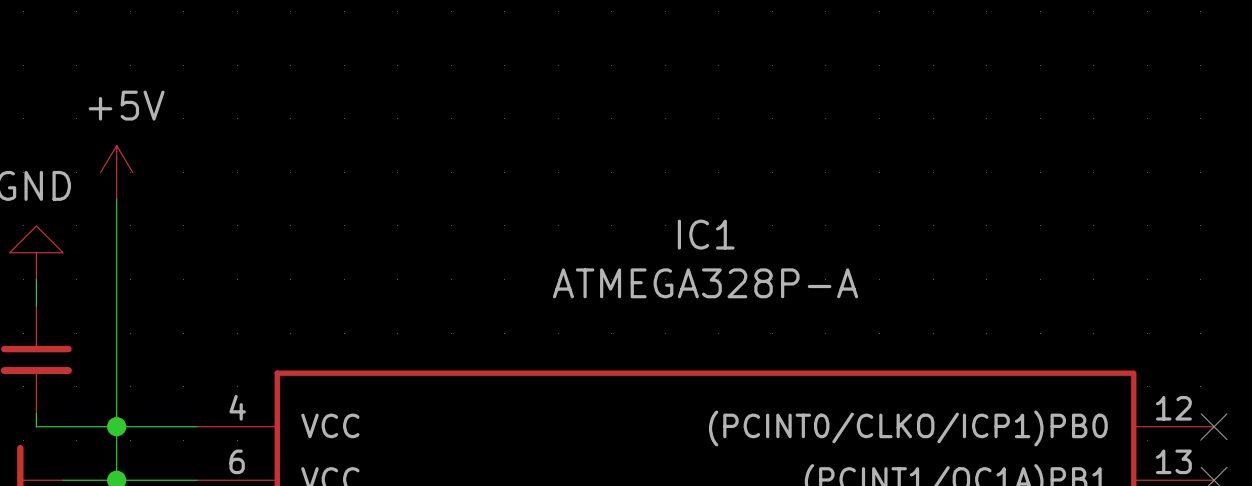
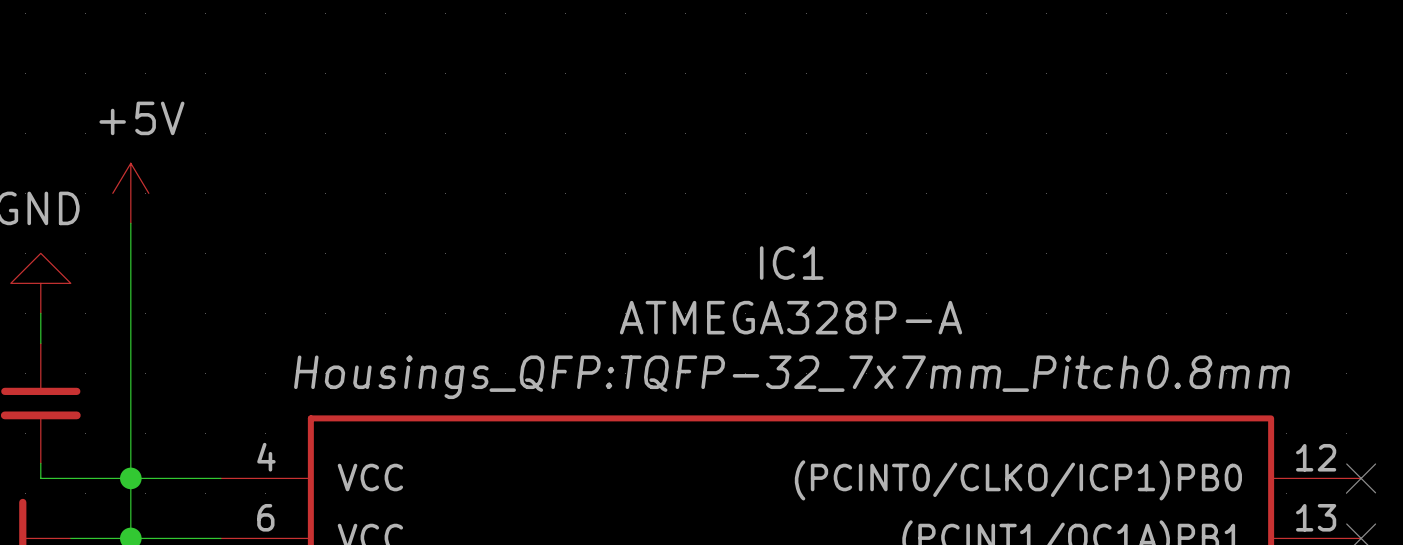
IC1 text: none -> Housings_QFP:TQFP-32_7x7mm_Pitch0.8mm (791, 377)

